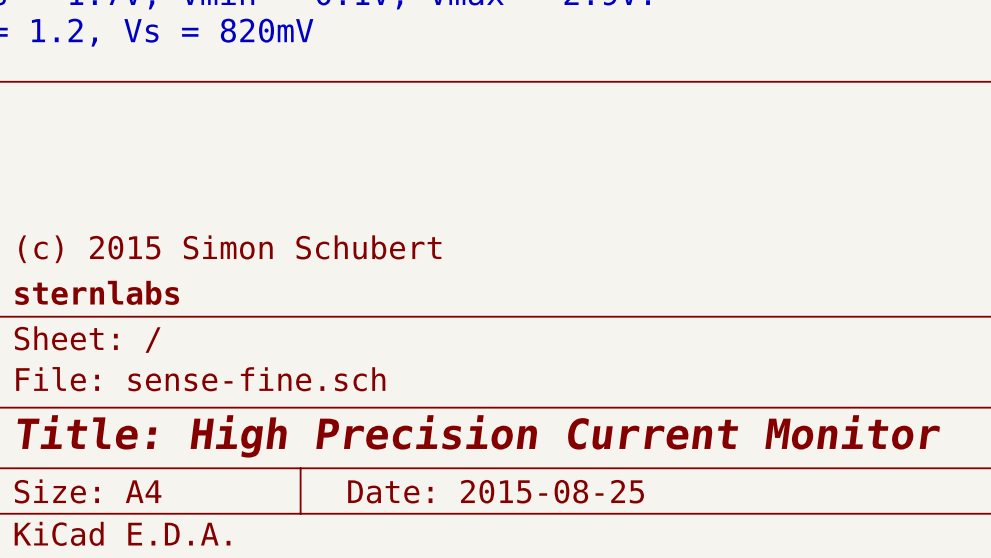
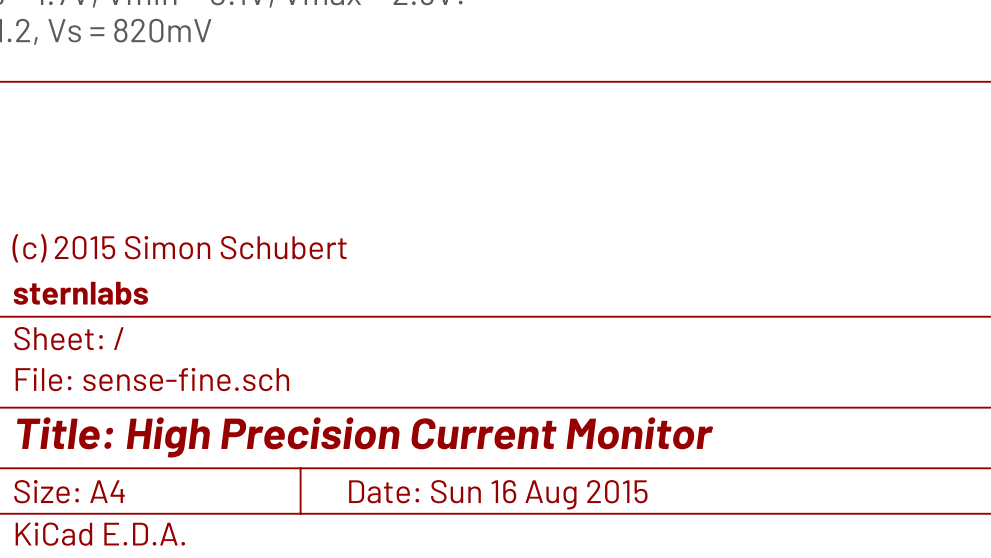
title block: Date: 2015-08-25 (496, 491) -> Date: Sun 16 Aug 2015 (498, 494)

